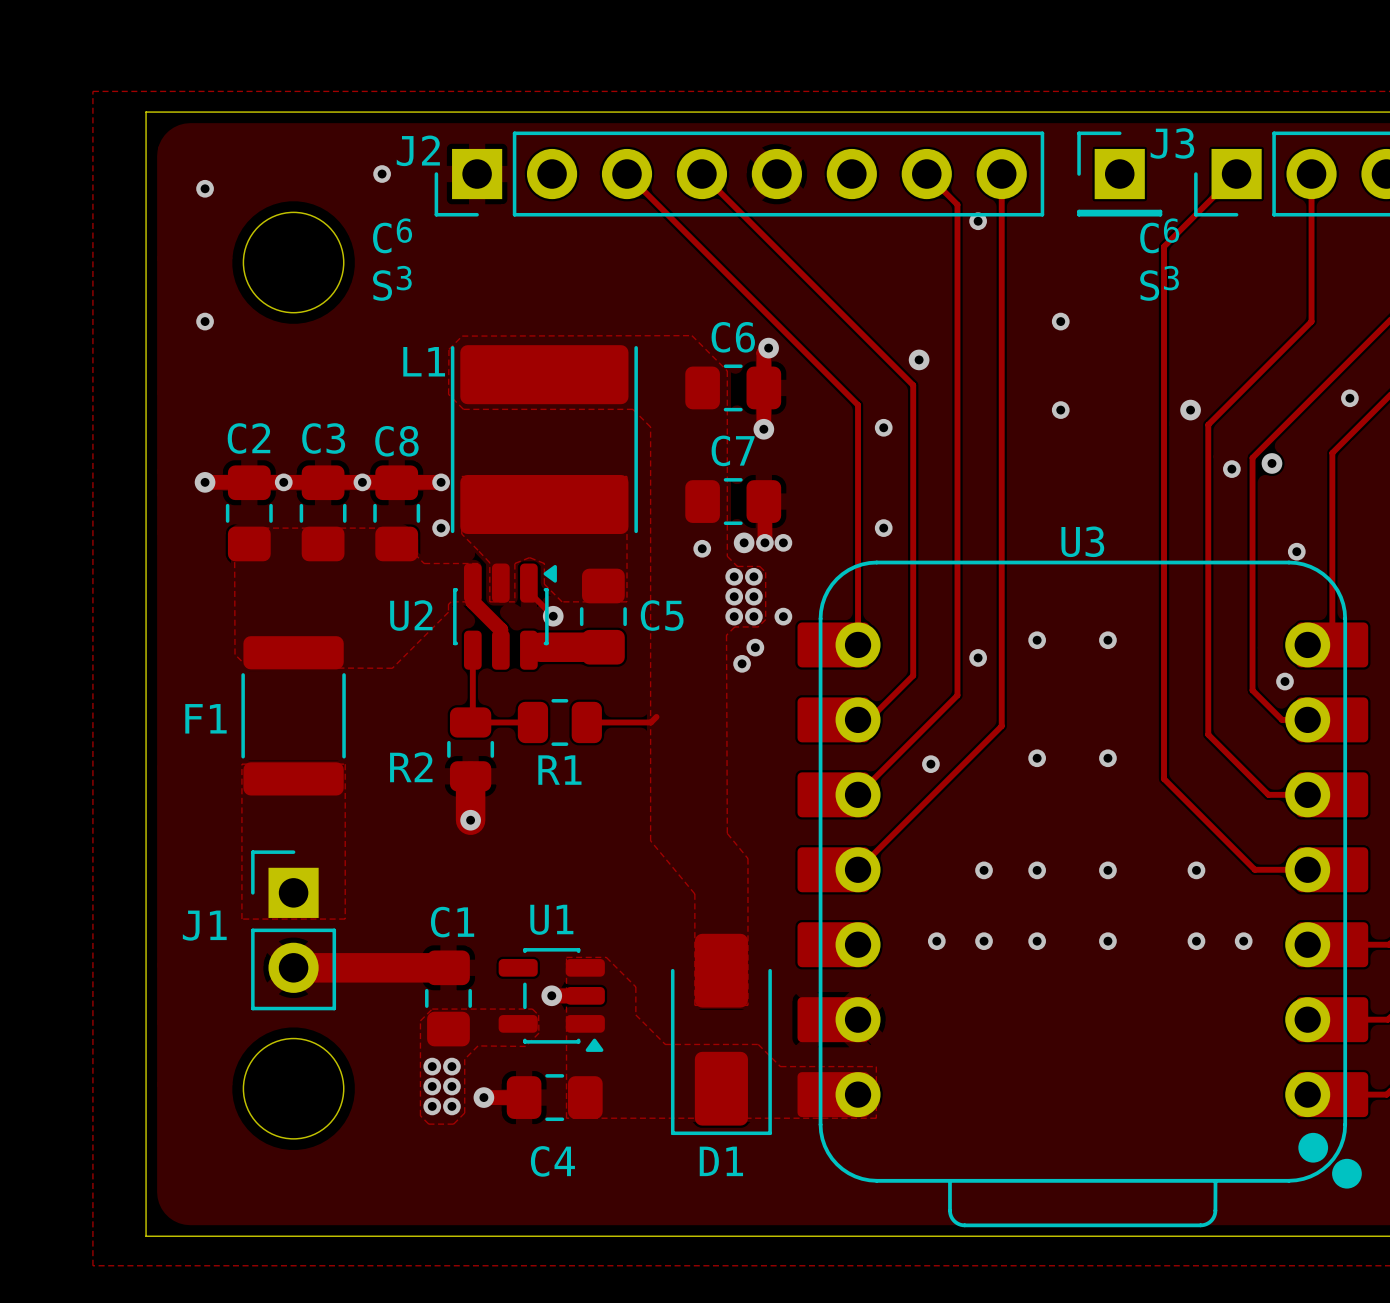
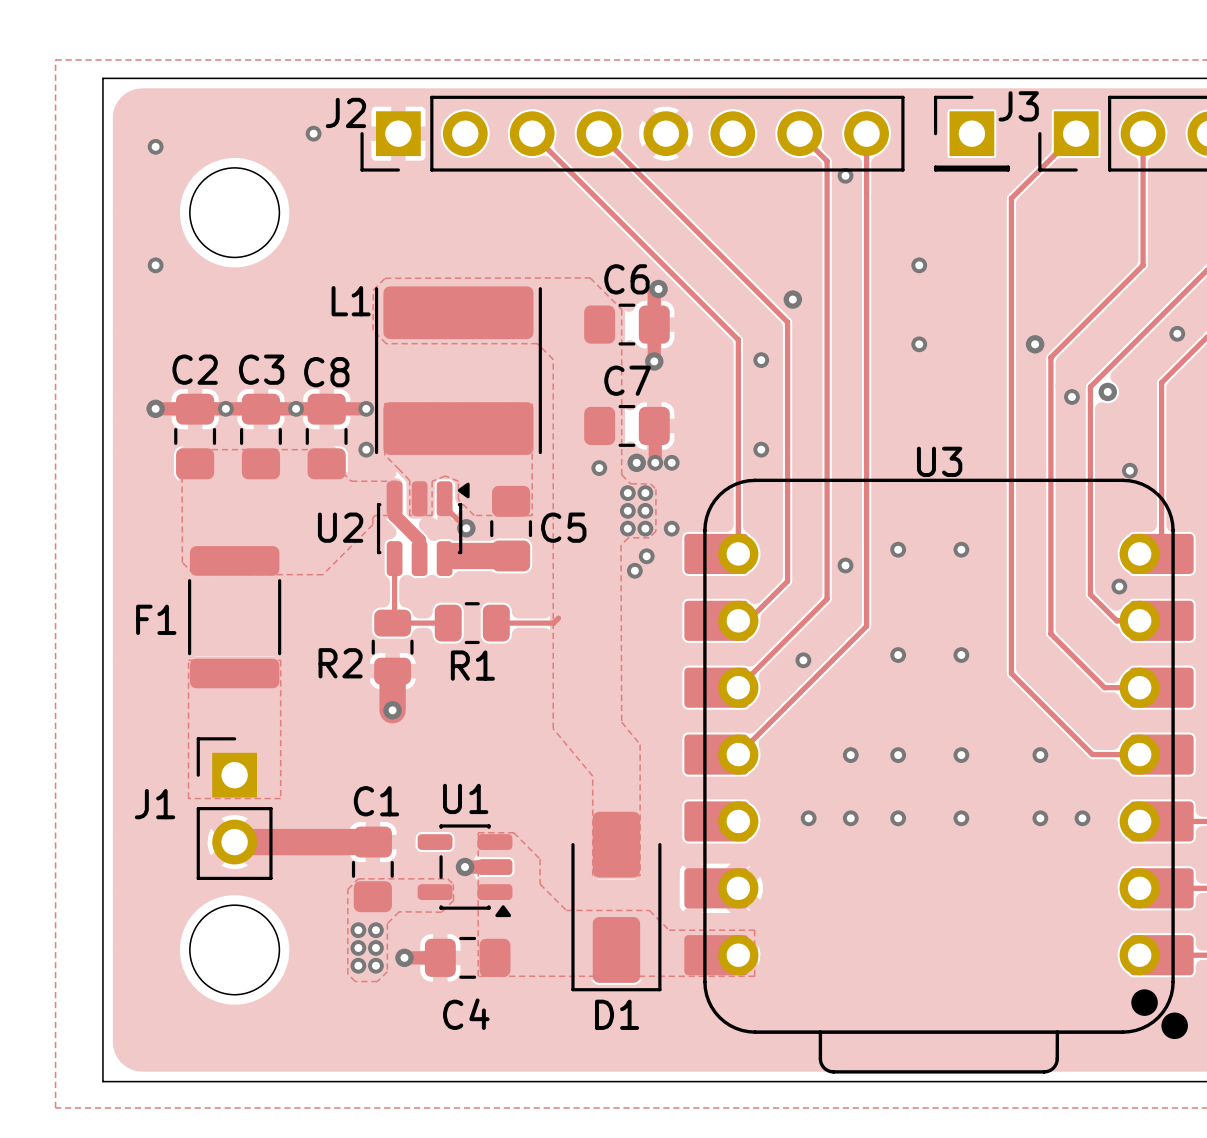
text: C6 (392, 235) -> none
text: C6 (1159, 235) -> none
text: S3 (392, 283) -> none
text: S3 (1159, 283) -> none

